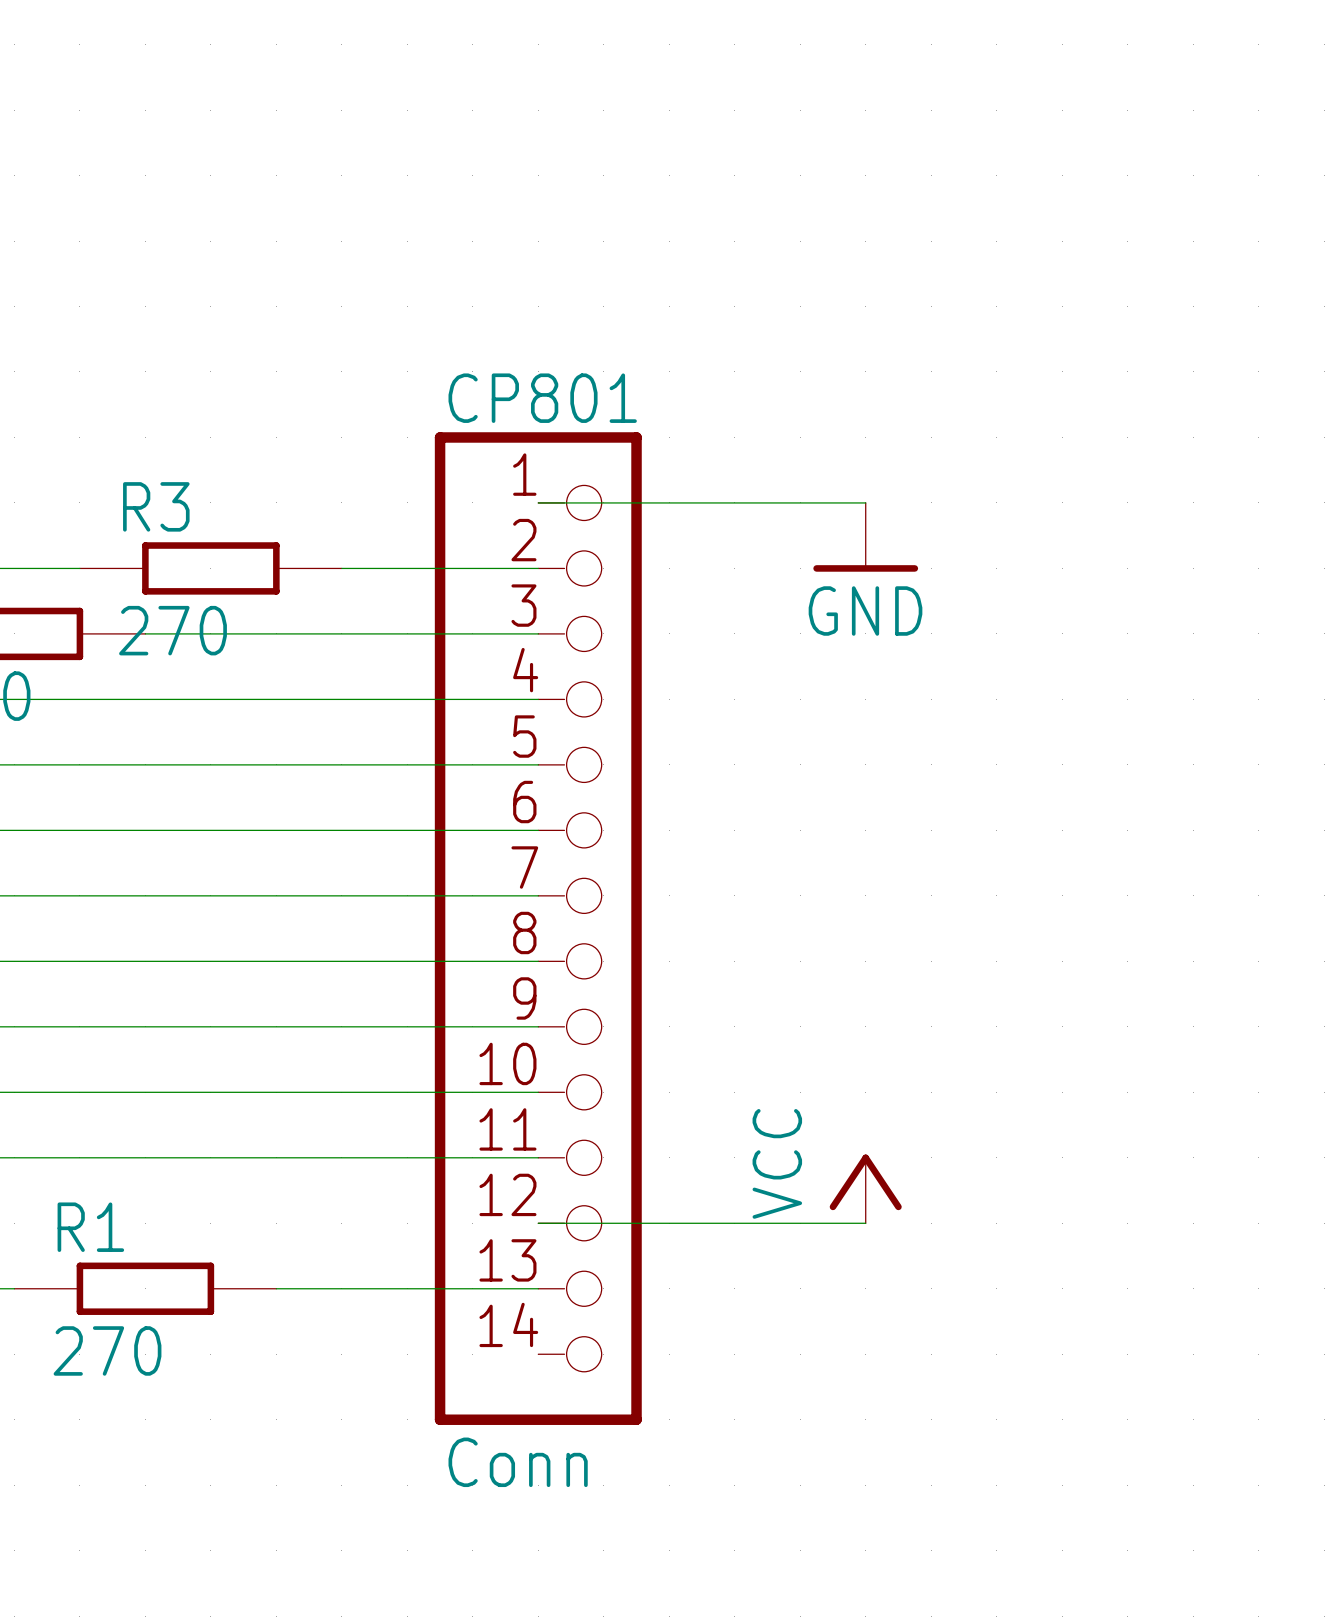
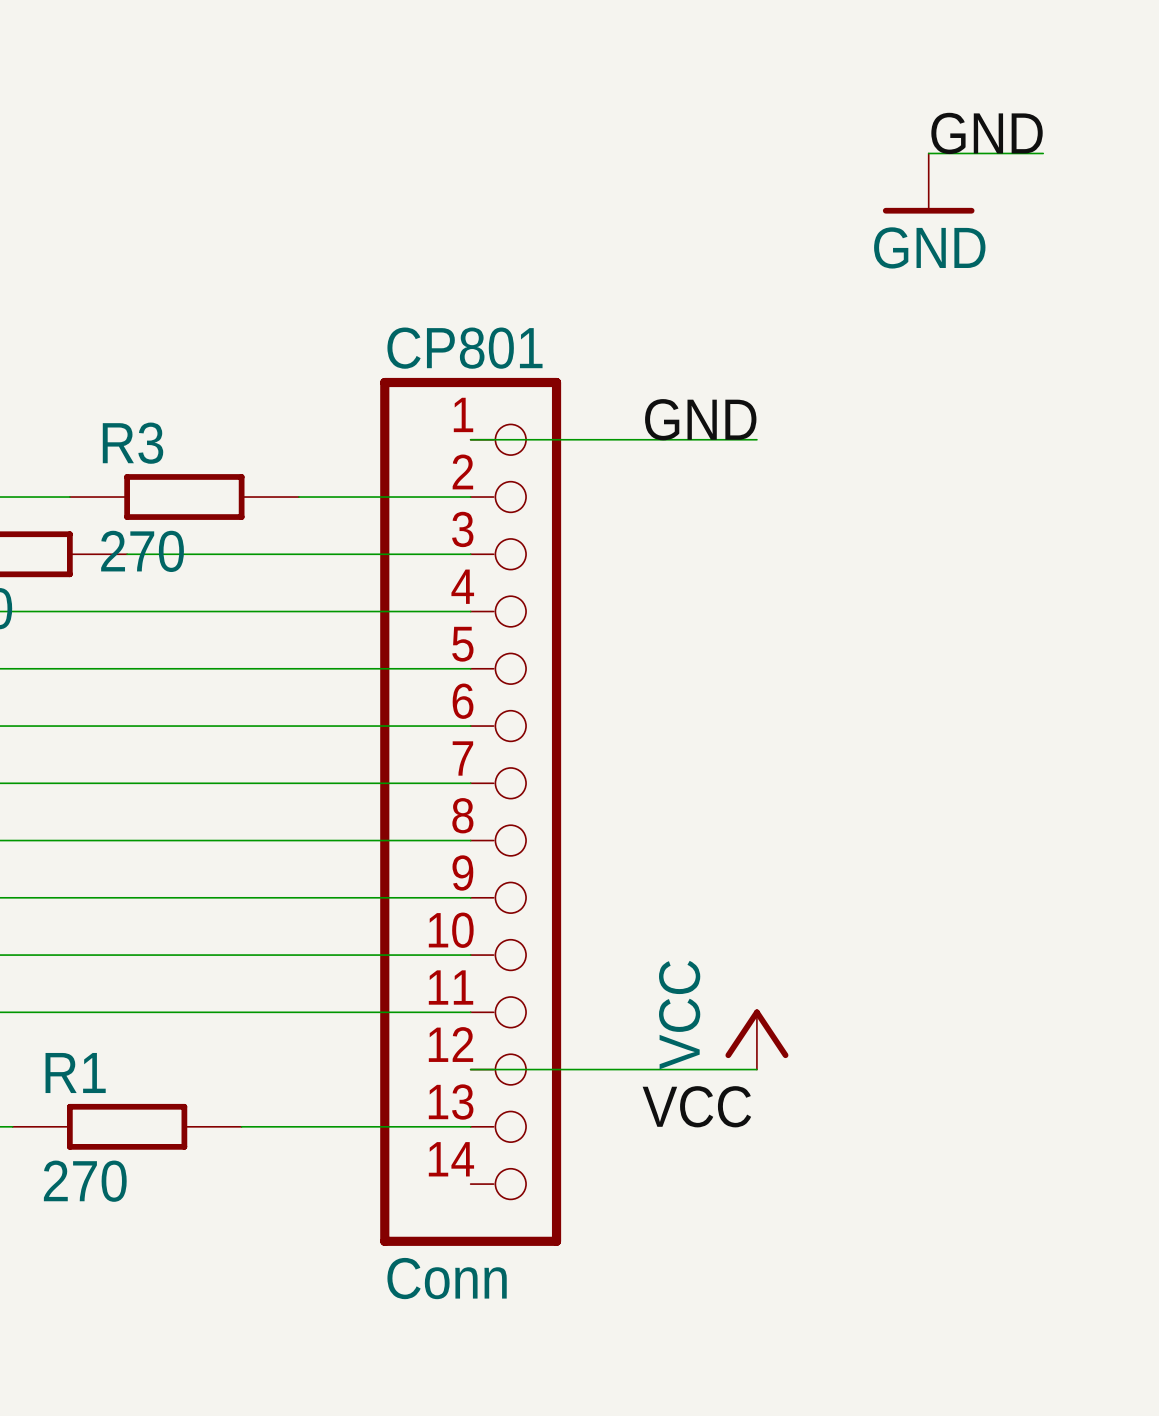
label: none -> GND (987, 133)
wire: none -> (928, 153) (1043, 153)
label: none -> GND (700, 419)
power symbol position: GND (865, 537) -> GND (928, 183)
label: none -> VCC (696, 1106)

